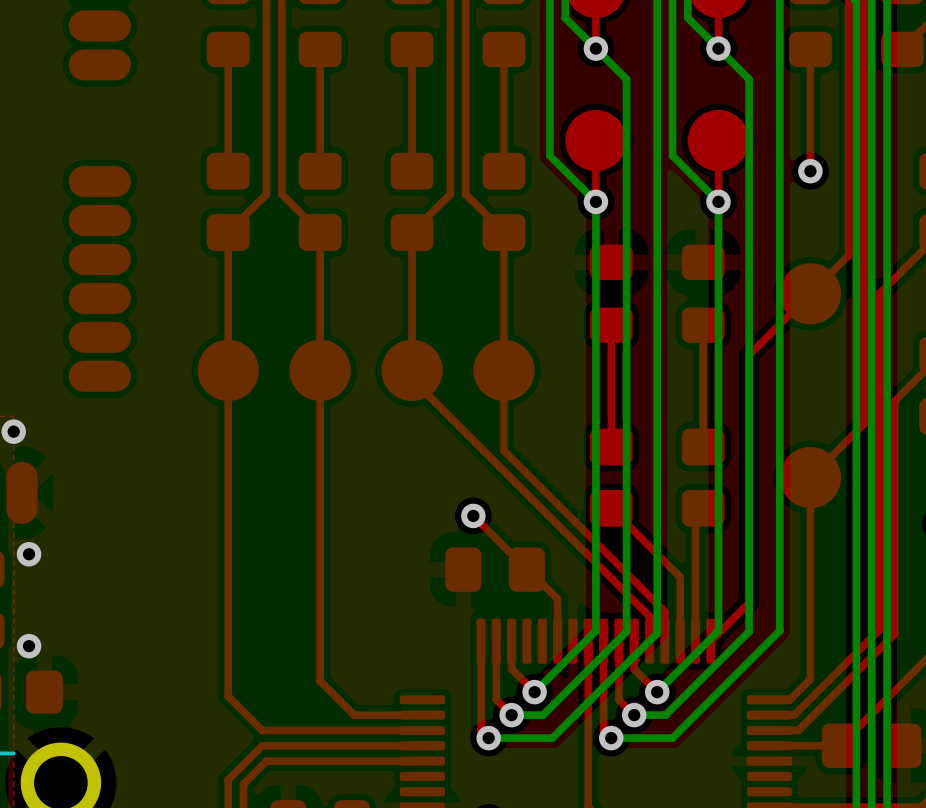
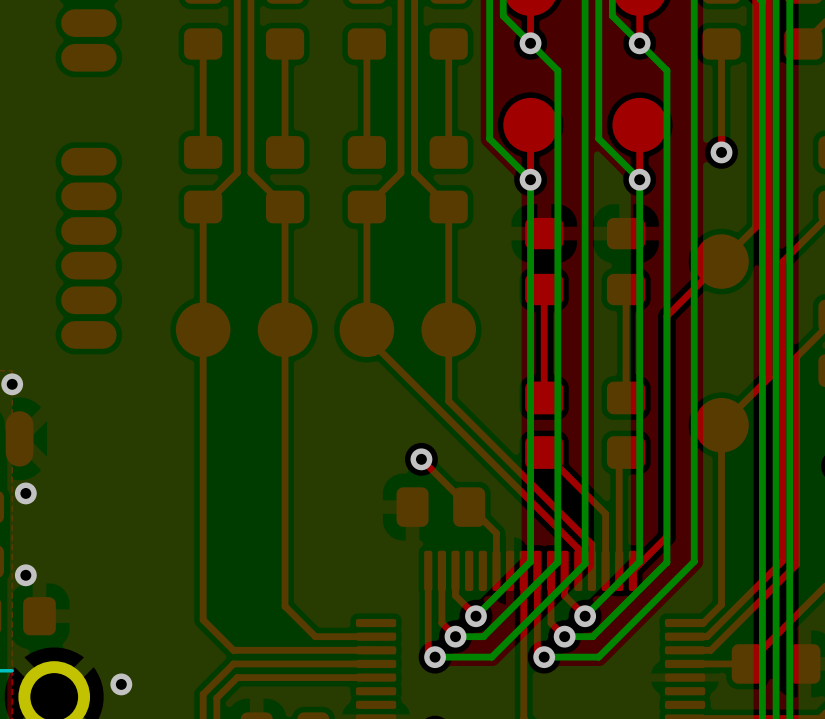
via: none -> (121, 684)

